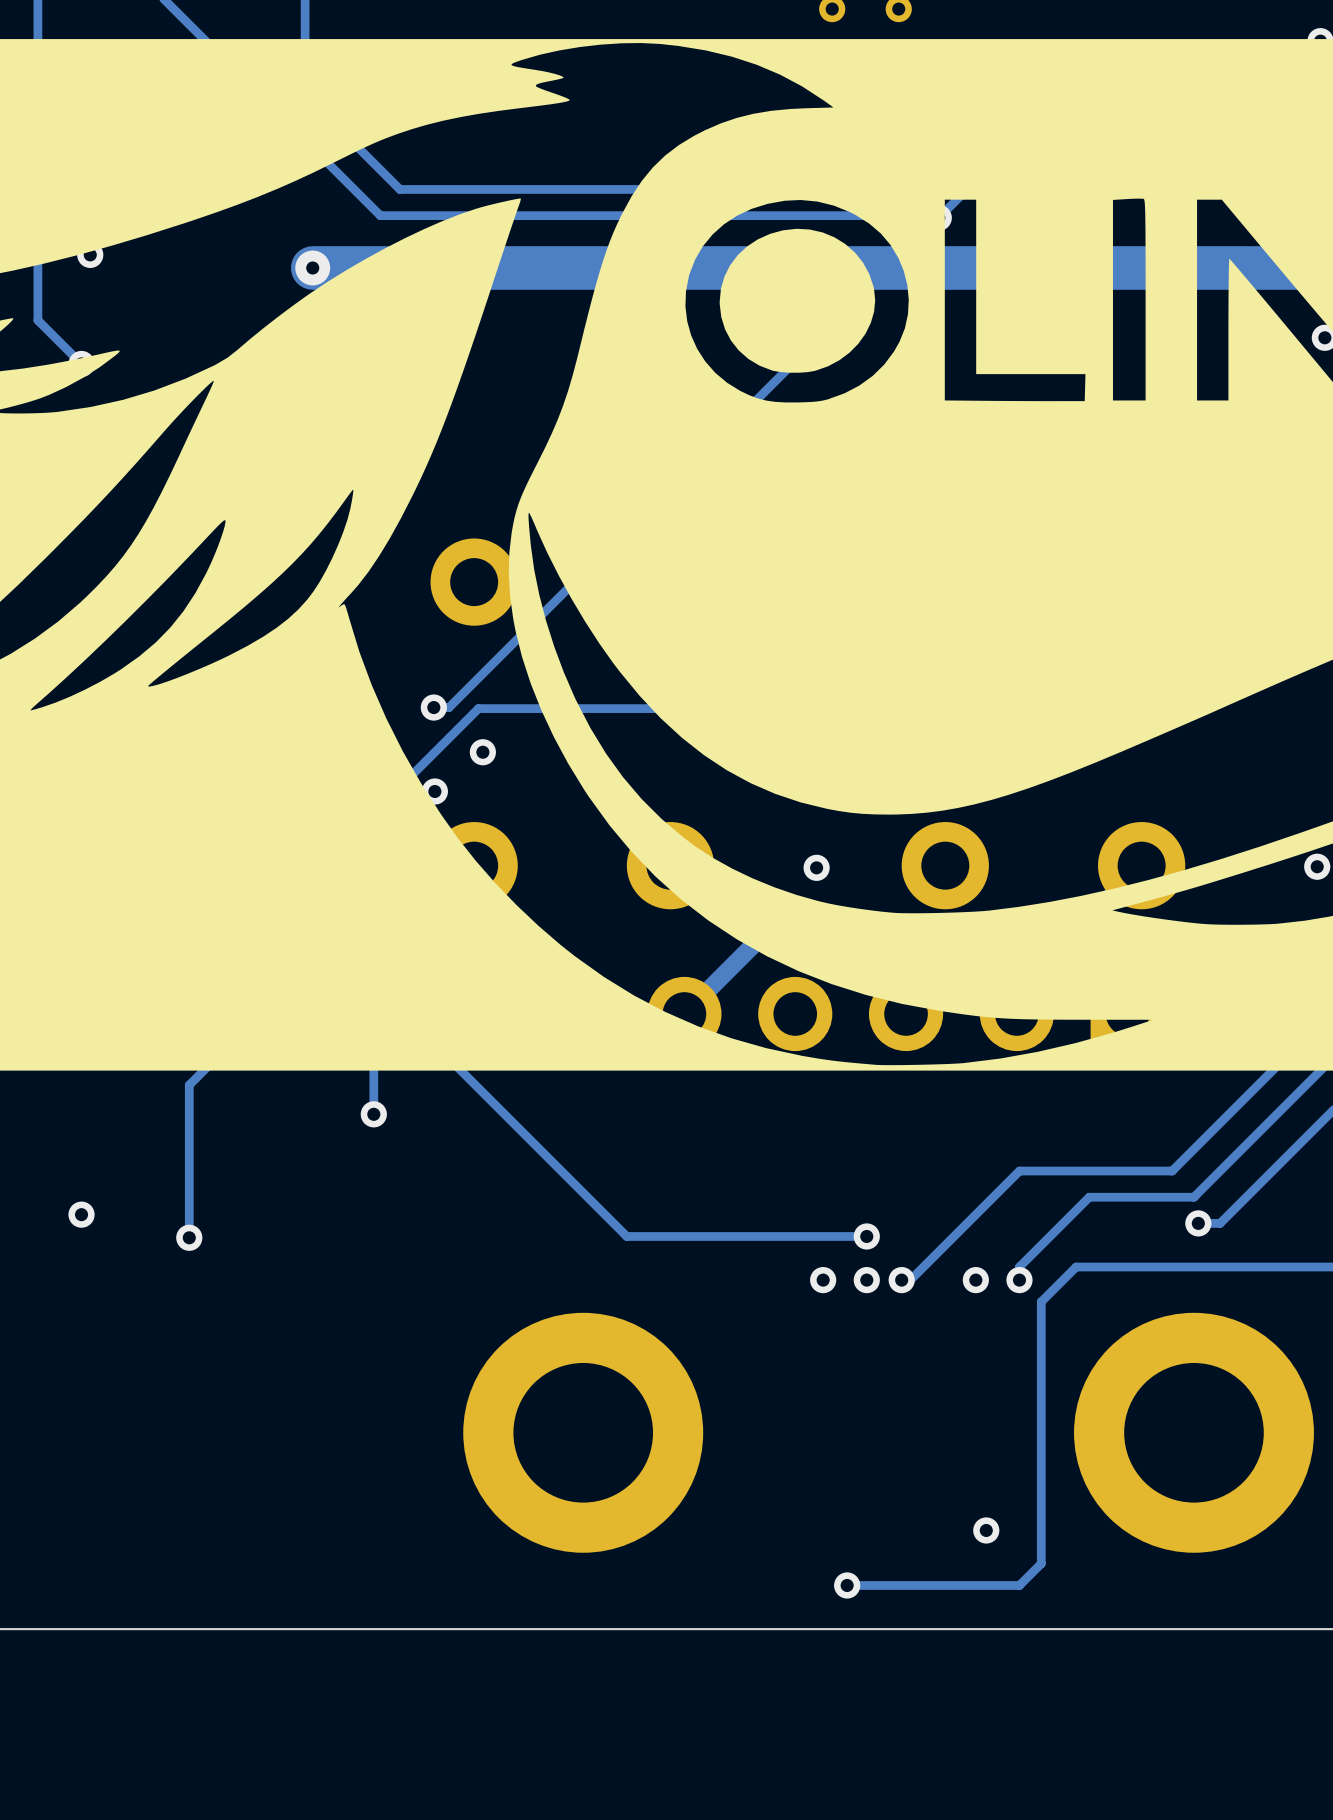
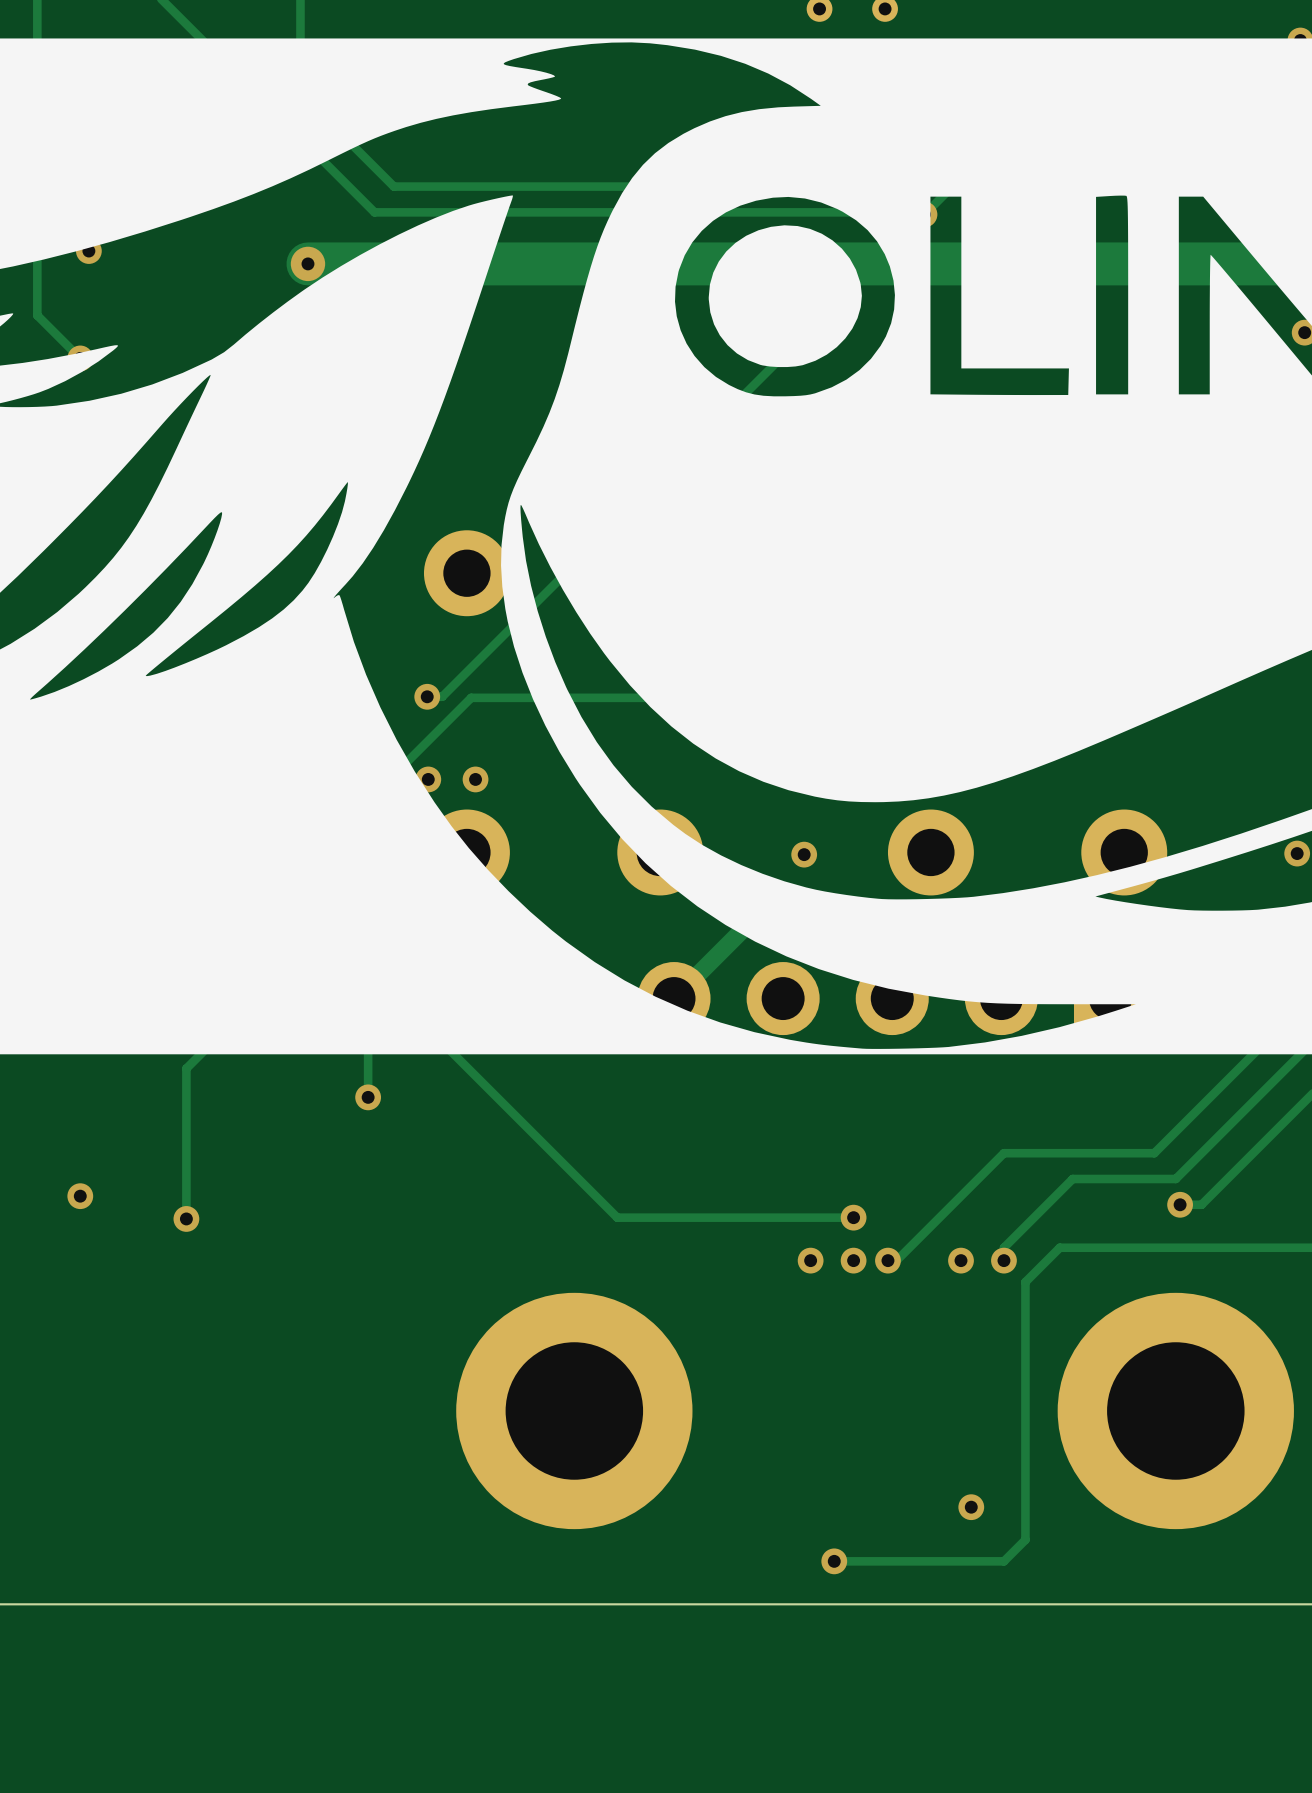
via position: (482, 752) -> (475, 779)

